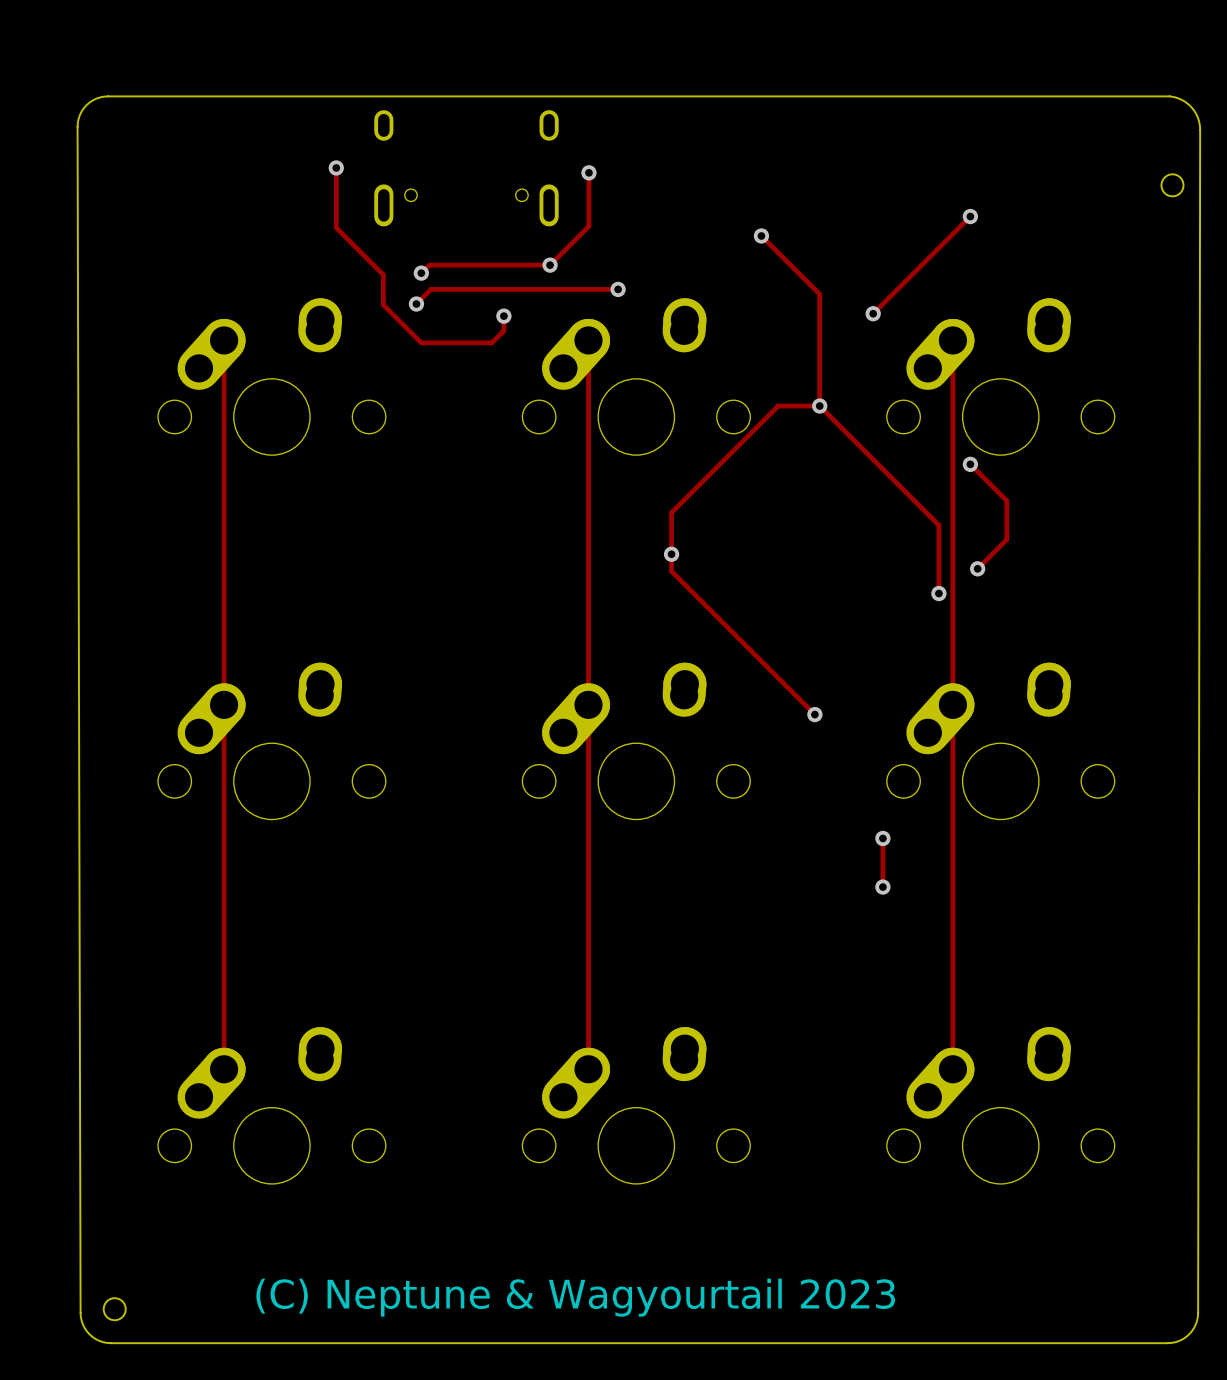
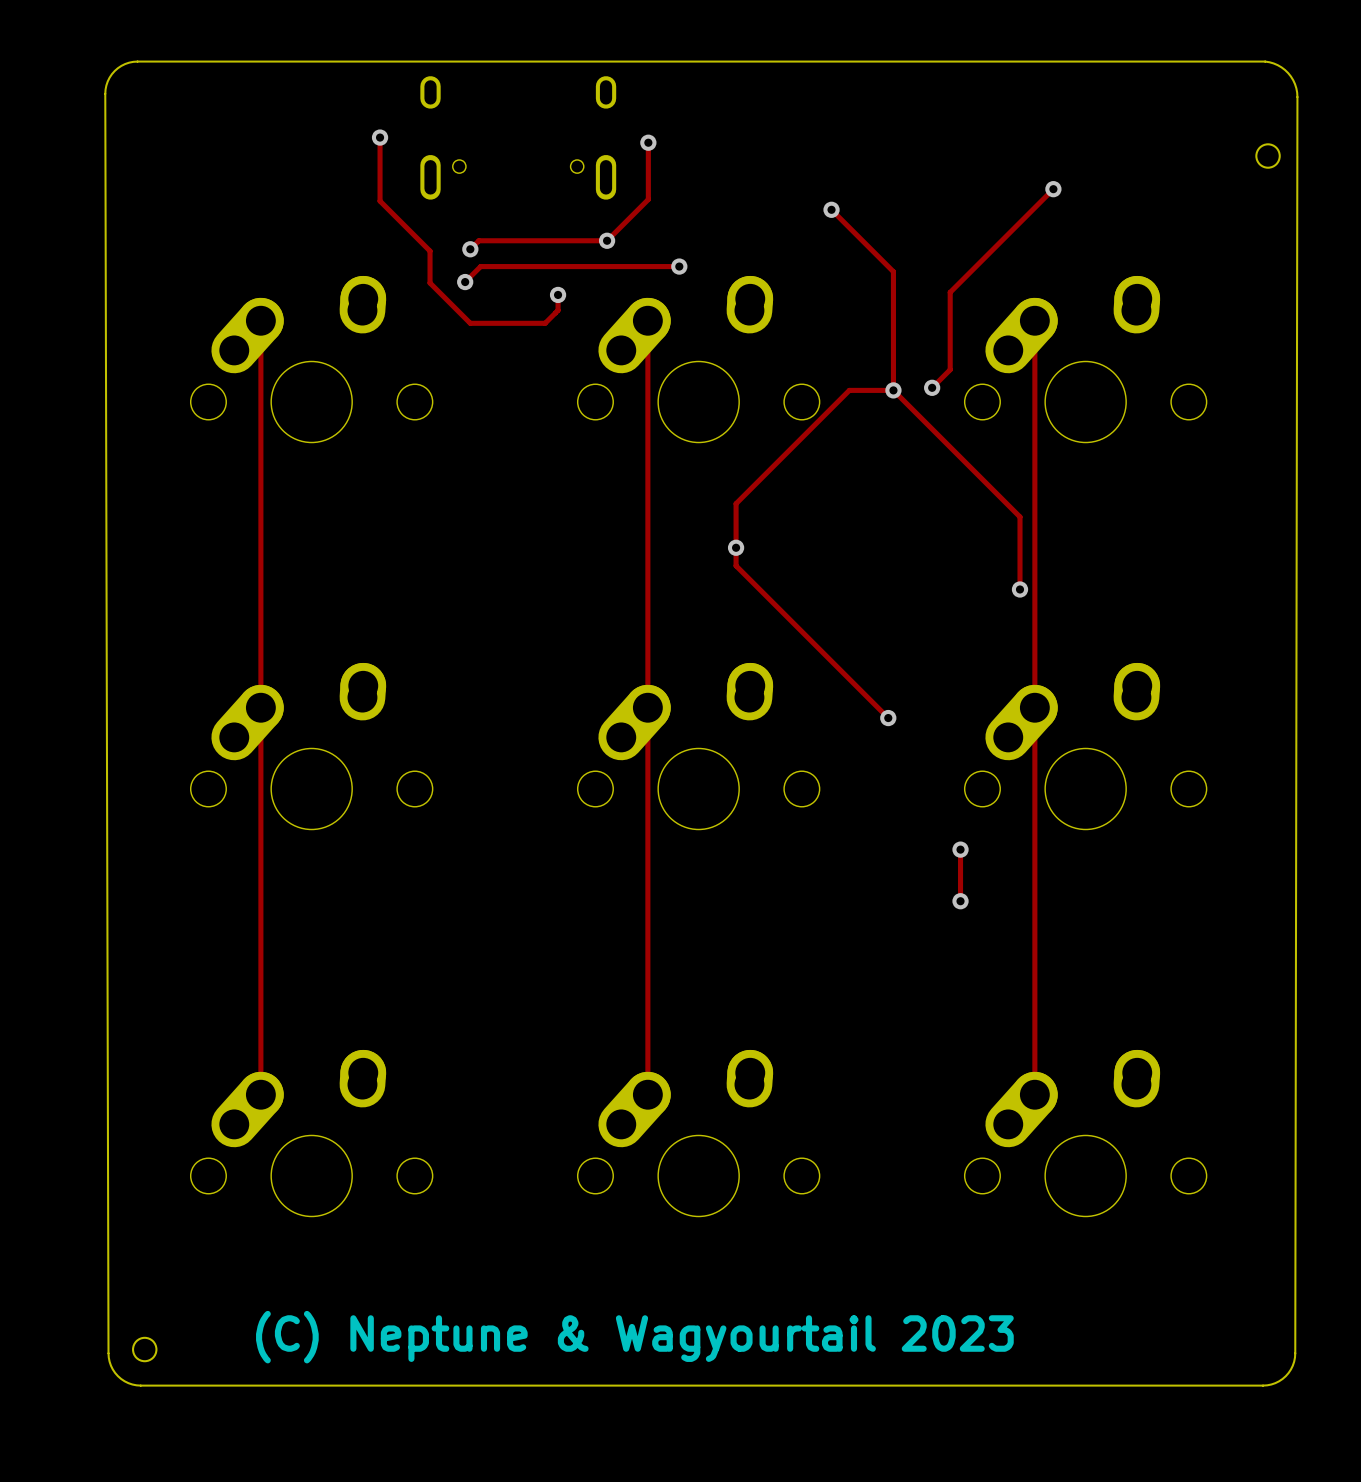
track: none -> (950, 292) (950, 369) (932, 387)
via: (873, 313) -> none
via: none -> (932, 387)
track: (970, 464) (1006, 500) (1006, 539) (977, 568) -> none
via: (970, 464) -> none
via: (977, 568) -> none

